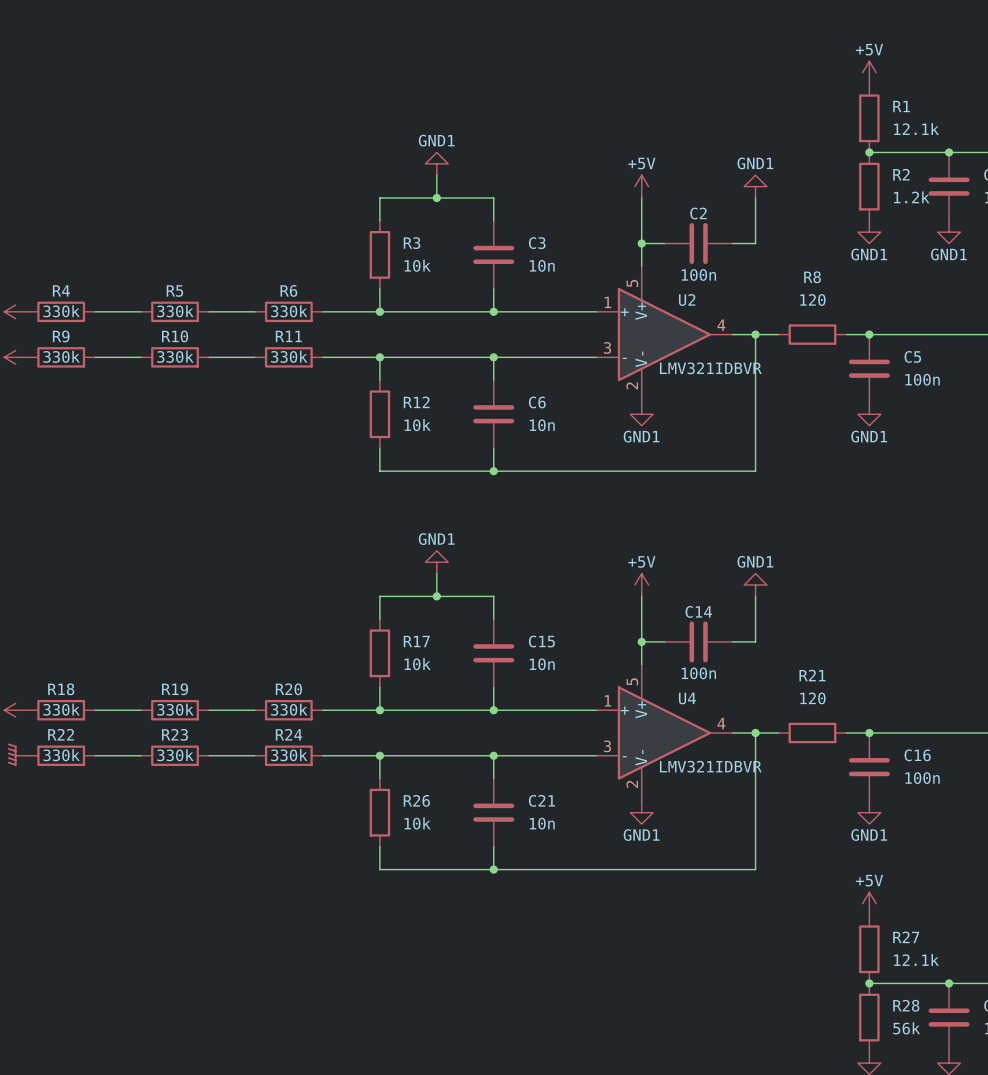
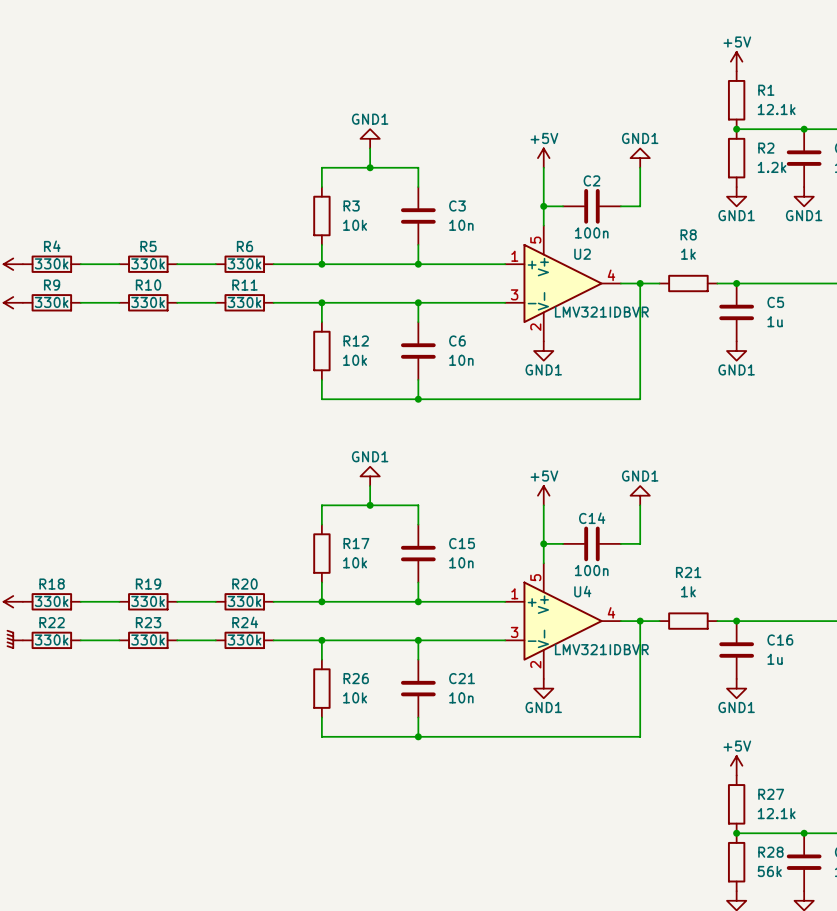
R8 value: 120 (812, 300) -> 1k (688, 254)
C5 value: 100n (922, 379) -> 1u (775, 321)
R21 value: 120 (812, 698) -> 1k (688, 591)
C16 value: 100n (922, 778) -> 1u (775, 659)

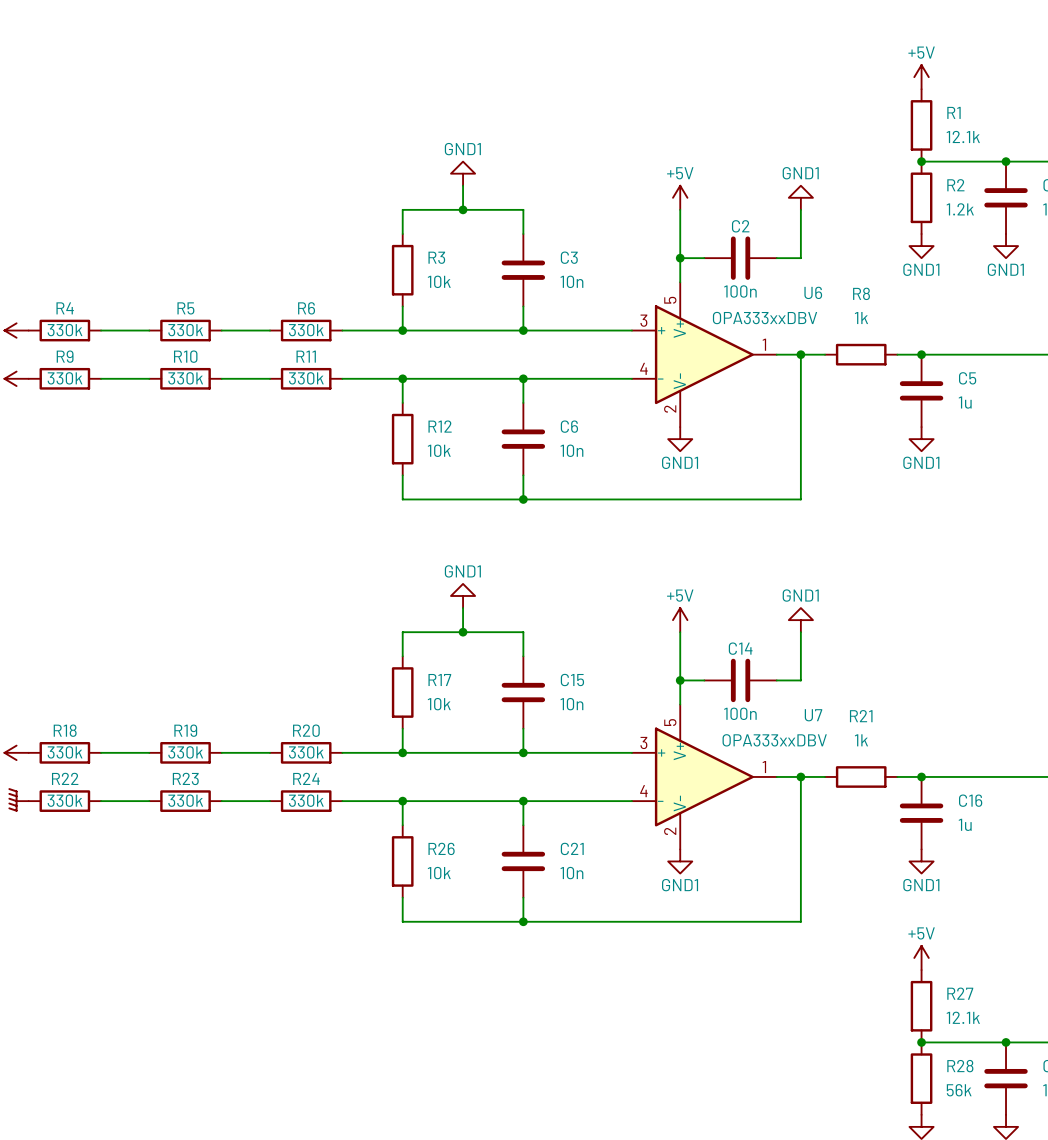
U2 name: U2 (582, 254) -> U6 (813, 292)
U2 pin number: 1 (514, 256) -> 3 (643, 320)
U2 pin number: 4 (611, 275) -> 1 (764, 344)
U2 pin number: 3 (514, 294) -> 4 (643, 368)
U2 value: LMV321IDBVR (601, 312) -> OPA333xxDBV (765, 318)
U4 name: U4 (582, 591) -> U7 (813, 715)
U4 pin number: 1 (514, 593) -> 3 (643, 742)
U4 pin number: 4 (611, 612) -> 1 (764, 767)
U4 pin number: 3 (514, 632) -> 4 (643, 791)
U4 value: LMV321IDBVR (601, 649) -> OPA333xxDBV (774, 740)

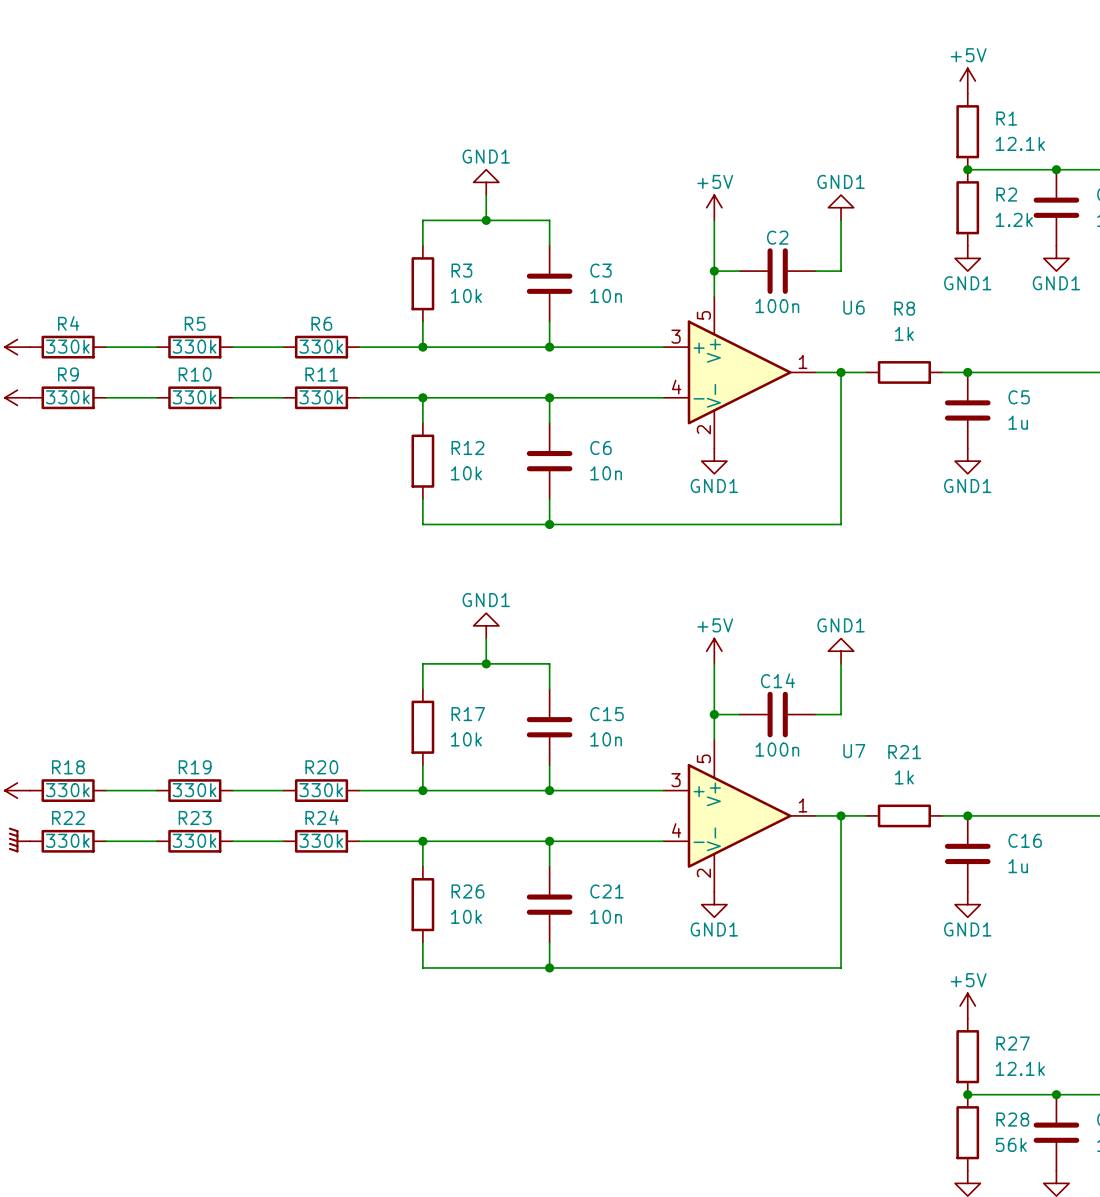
U6 value: OPA333xxDBV (765, 318) -> none
U7 value: OPA333xxDBV (774, 740) -> none

